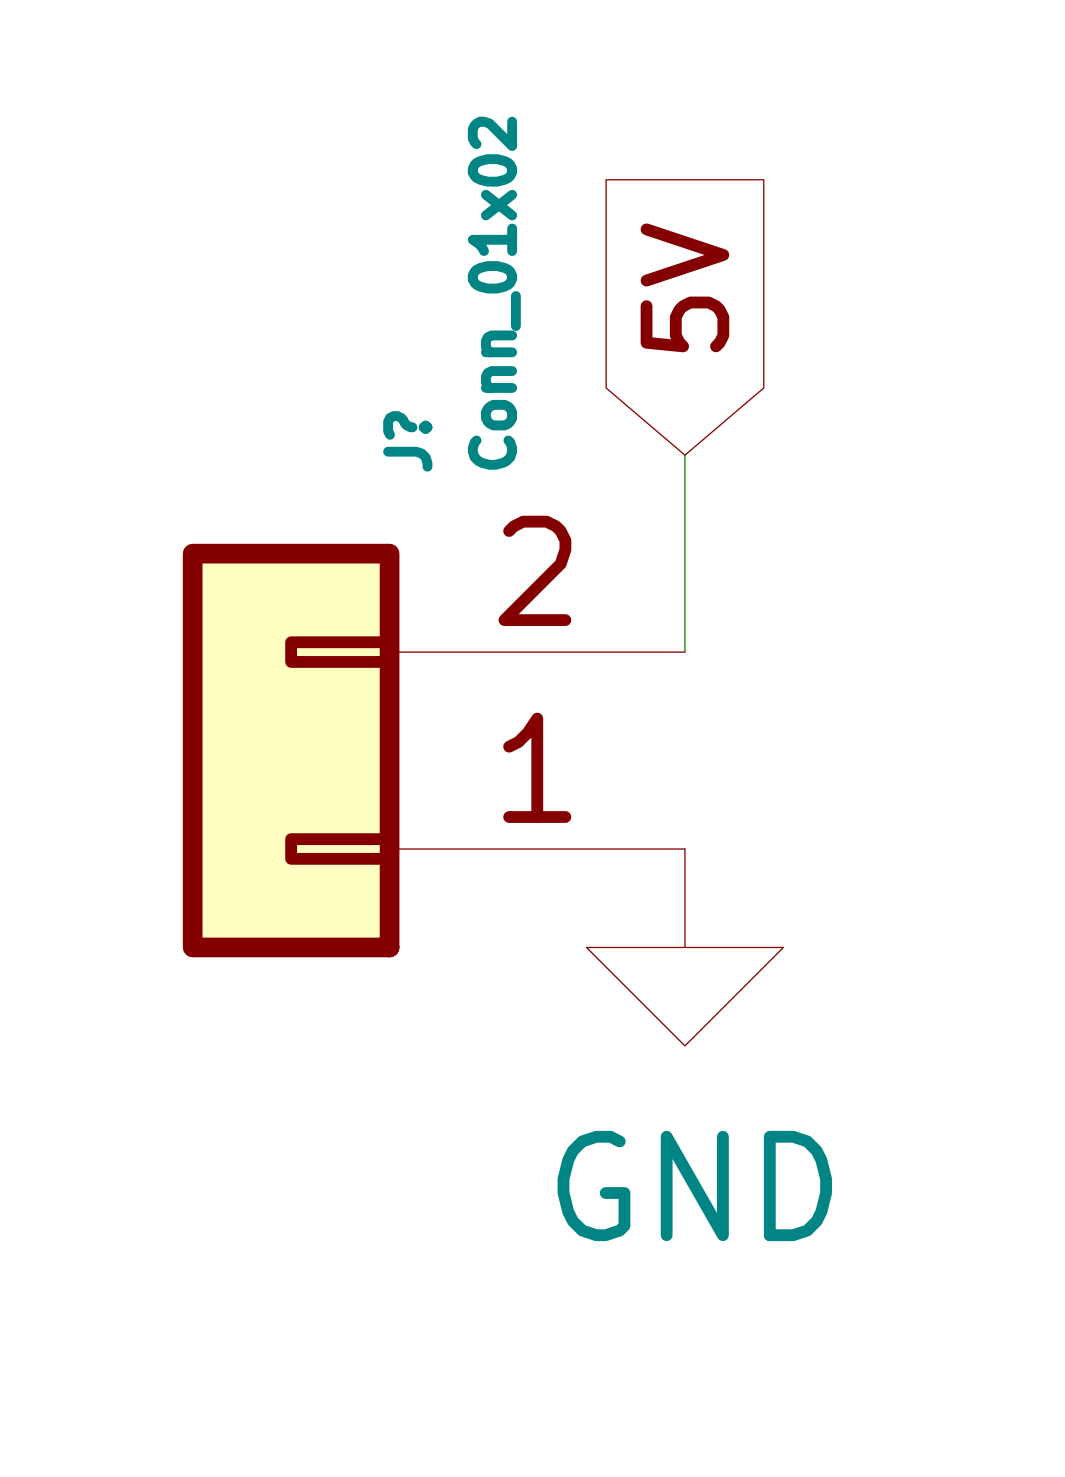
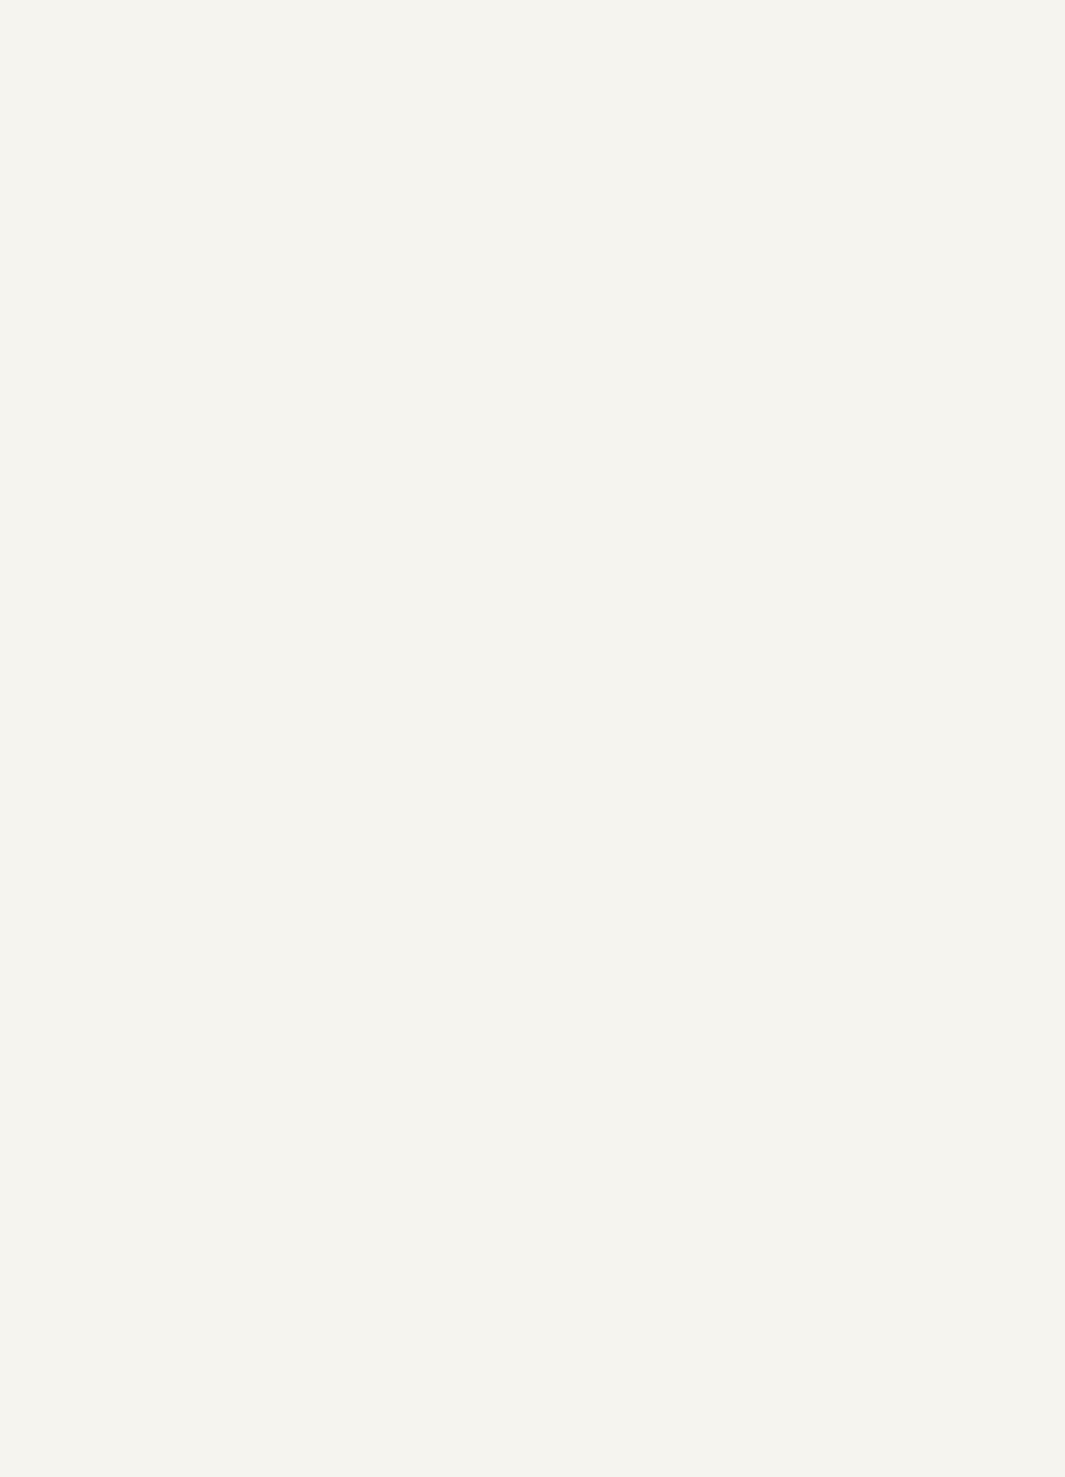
global label: 5V (684, 287) -> none
wire: (684, 455) (684, 652) -> none
J?: Conn_01x02 (433, 750) -> none
power symbol: GND (684, 947) -> none

